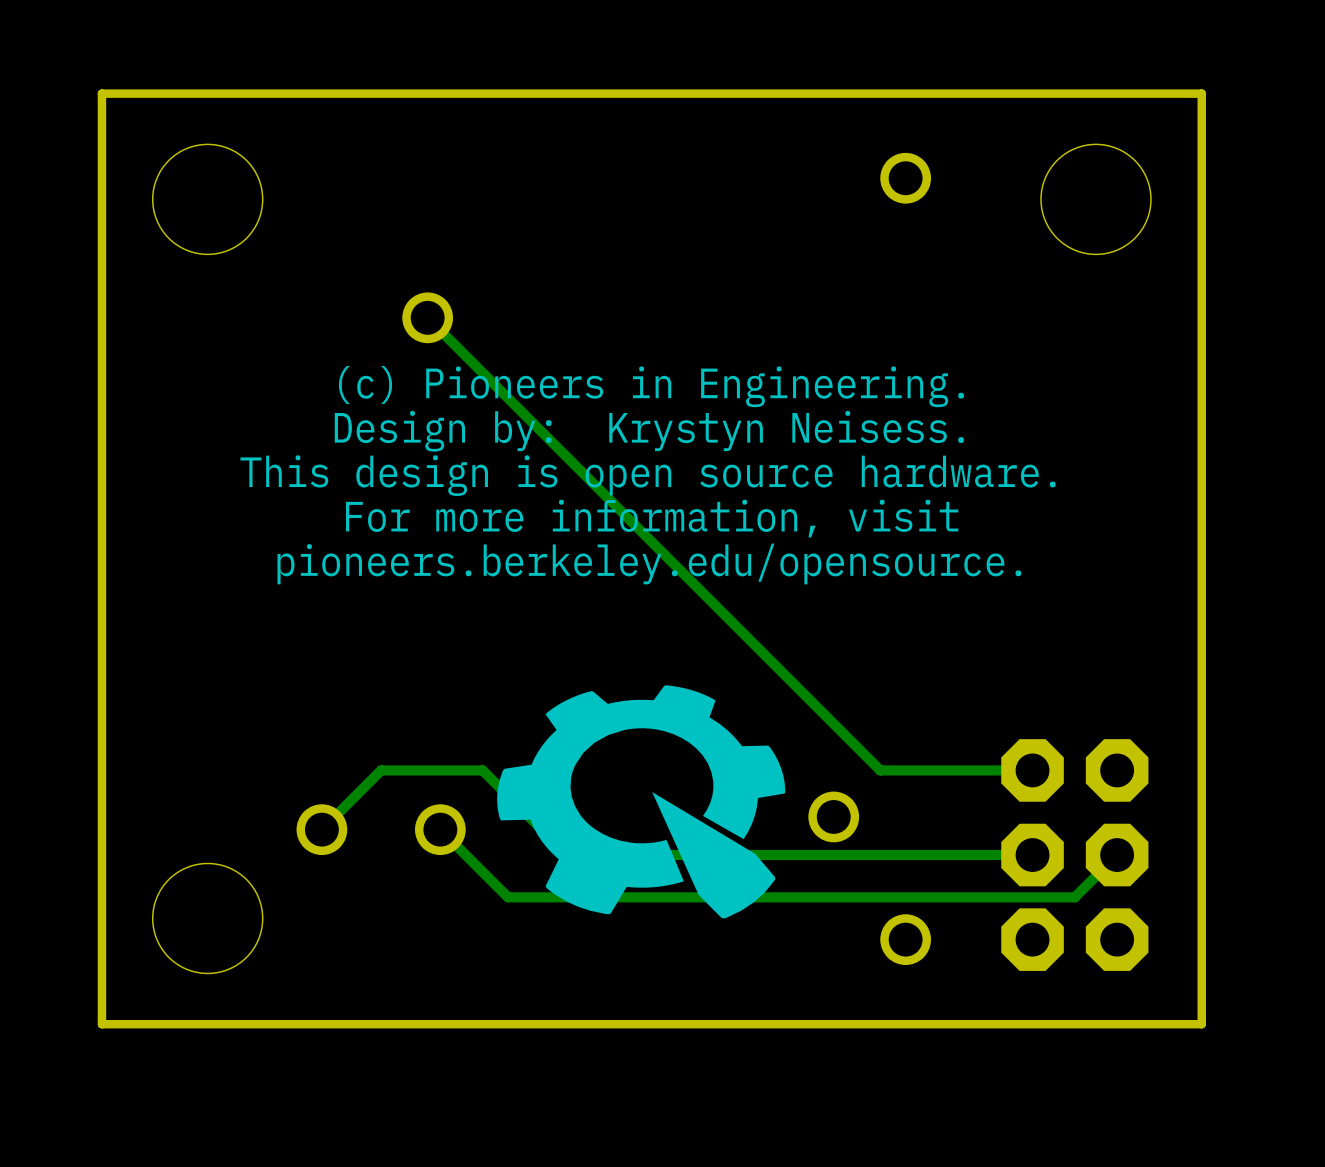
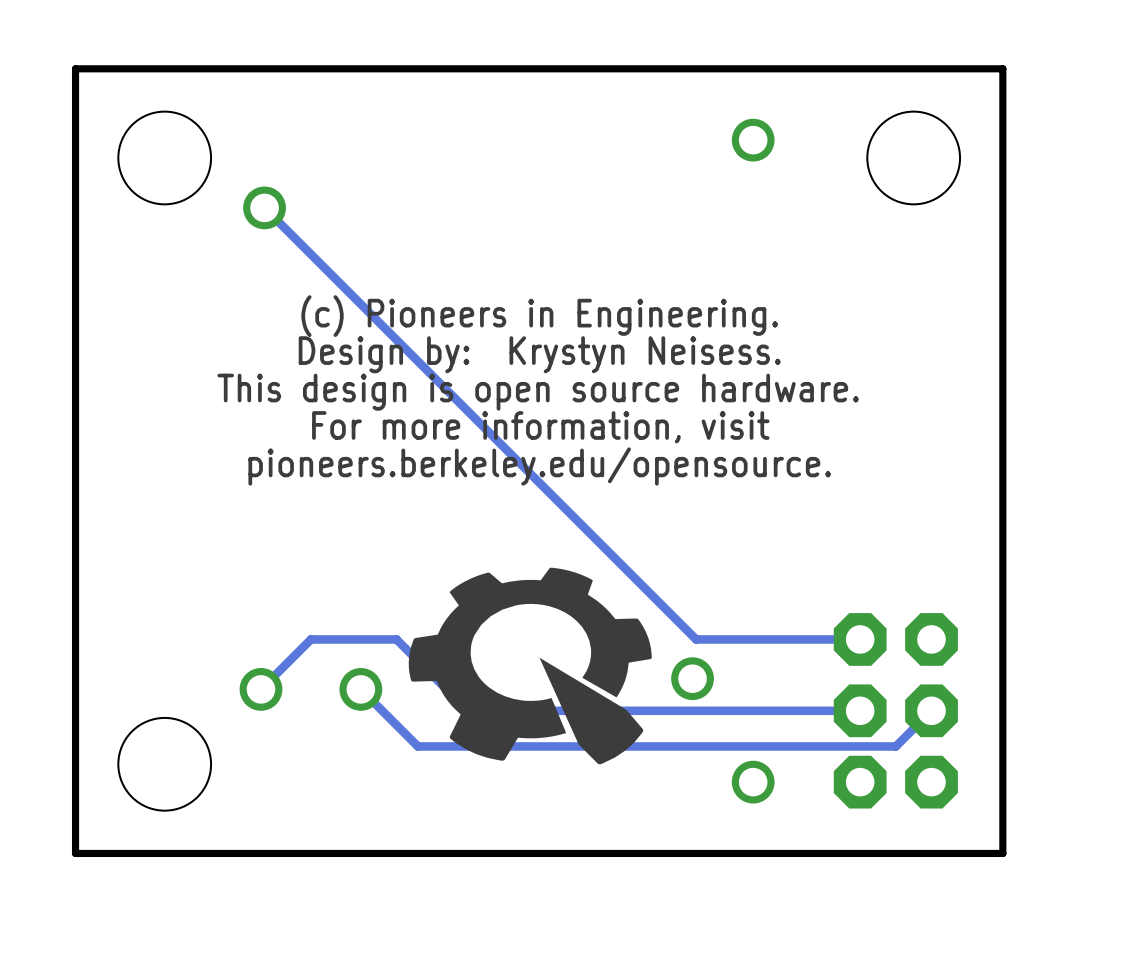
track: (427, 317) (880, 770) -> (264, 207) (696, 639) (731, 639)
part position: (427, 317) -> (264, 207)

